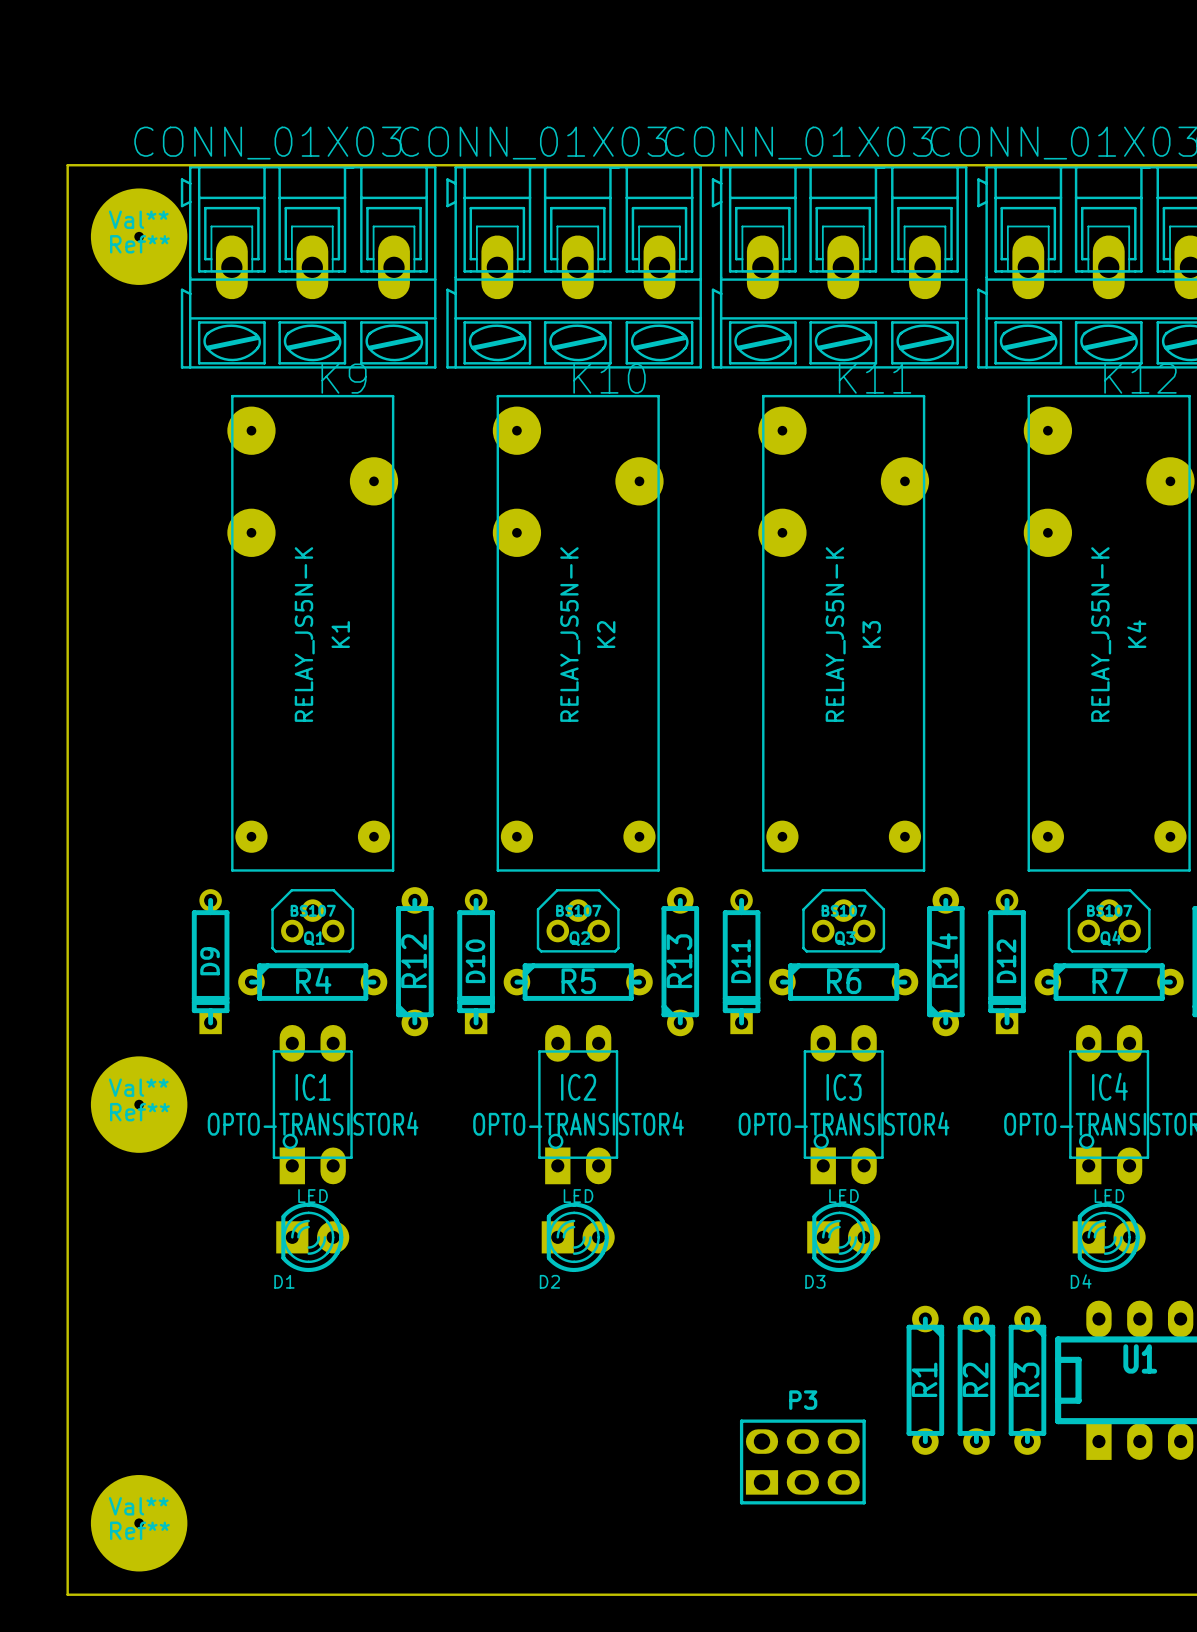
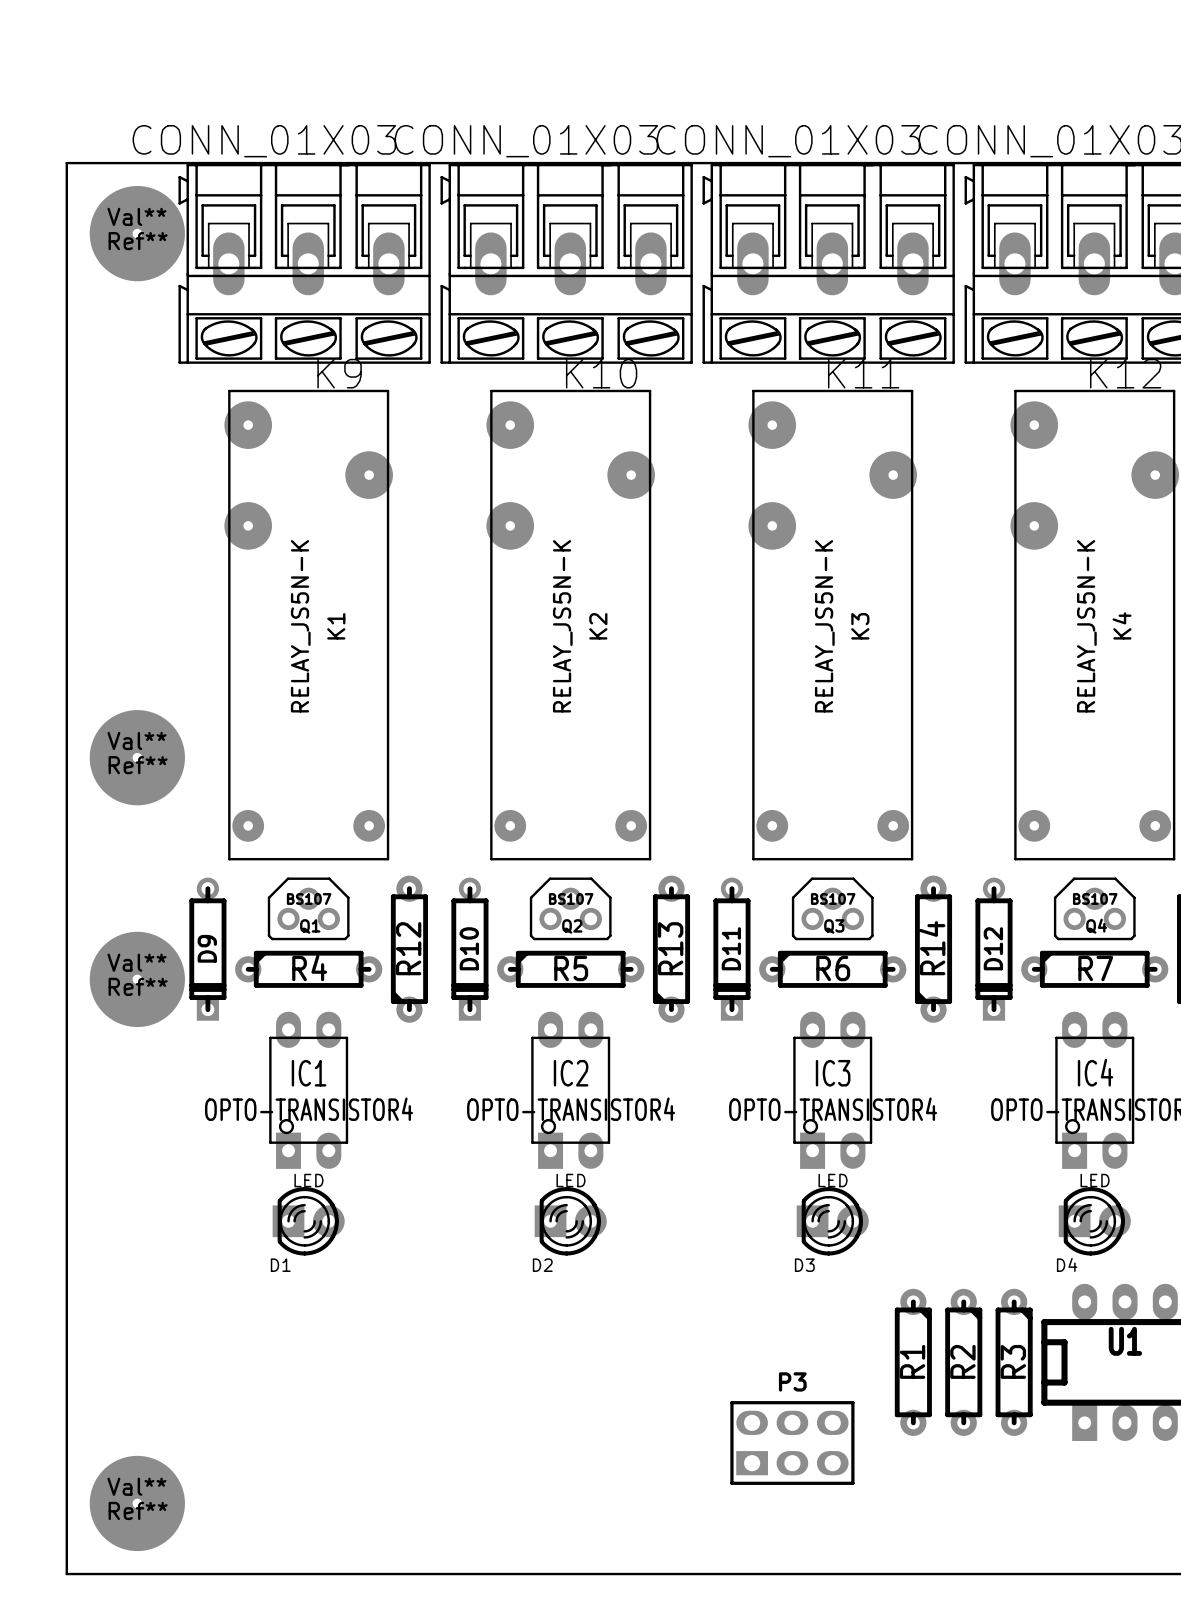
Ref**: none -> Val** (137, 757)
Ref** position: (139, 1104) -> (137, 979)

